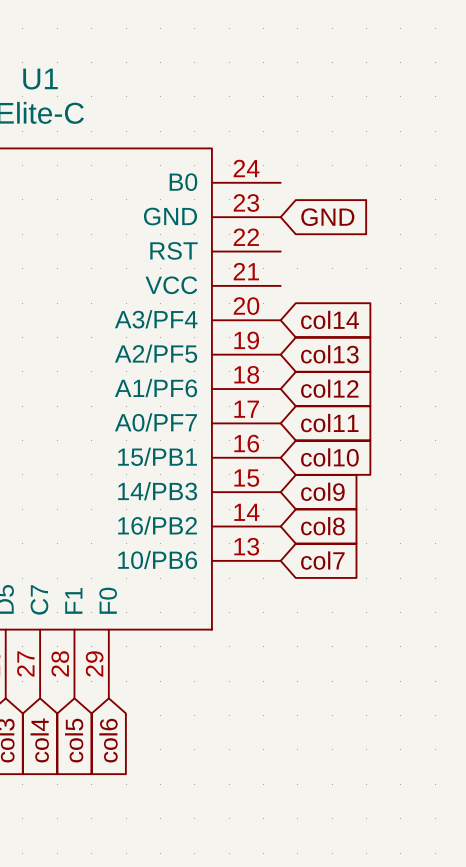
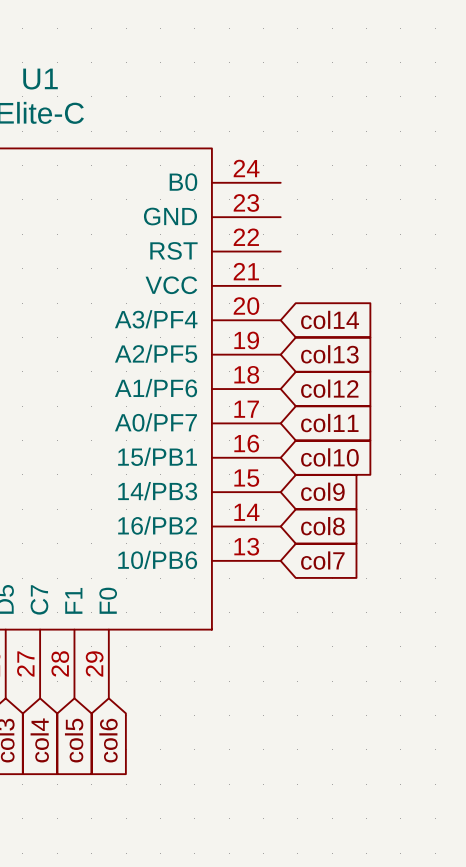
global label: GND (327, 217) -> none

